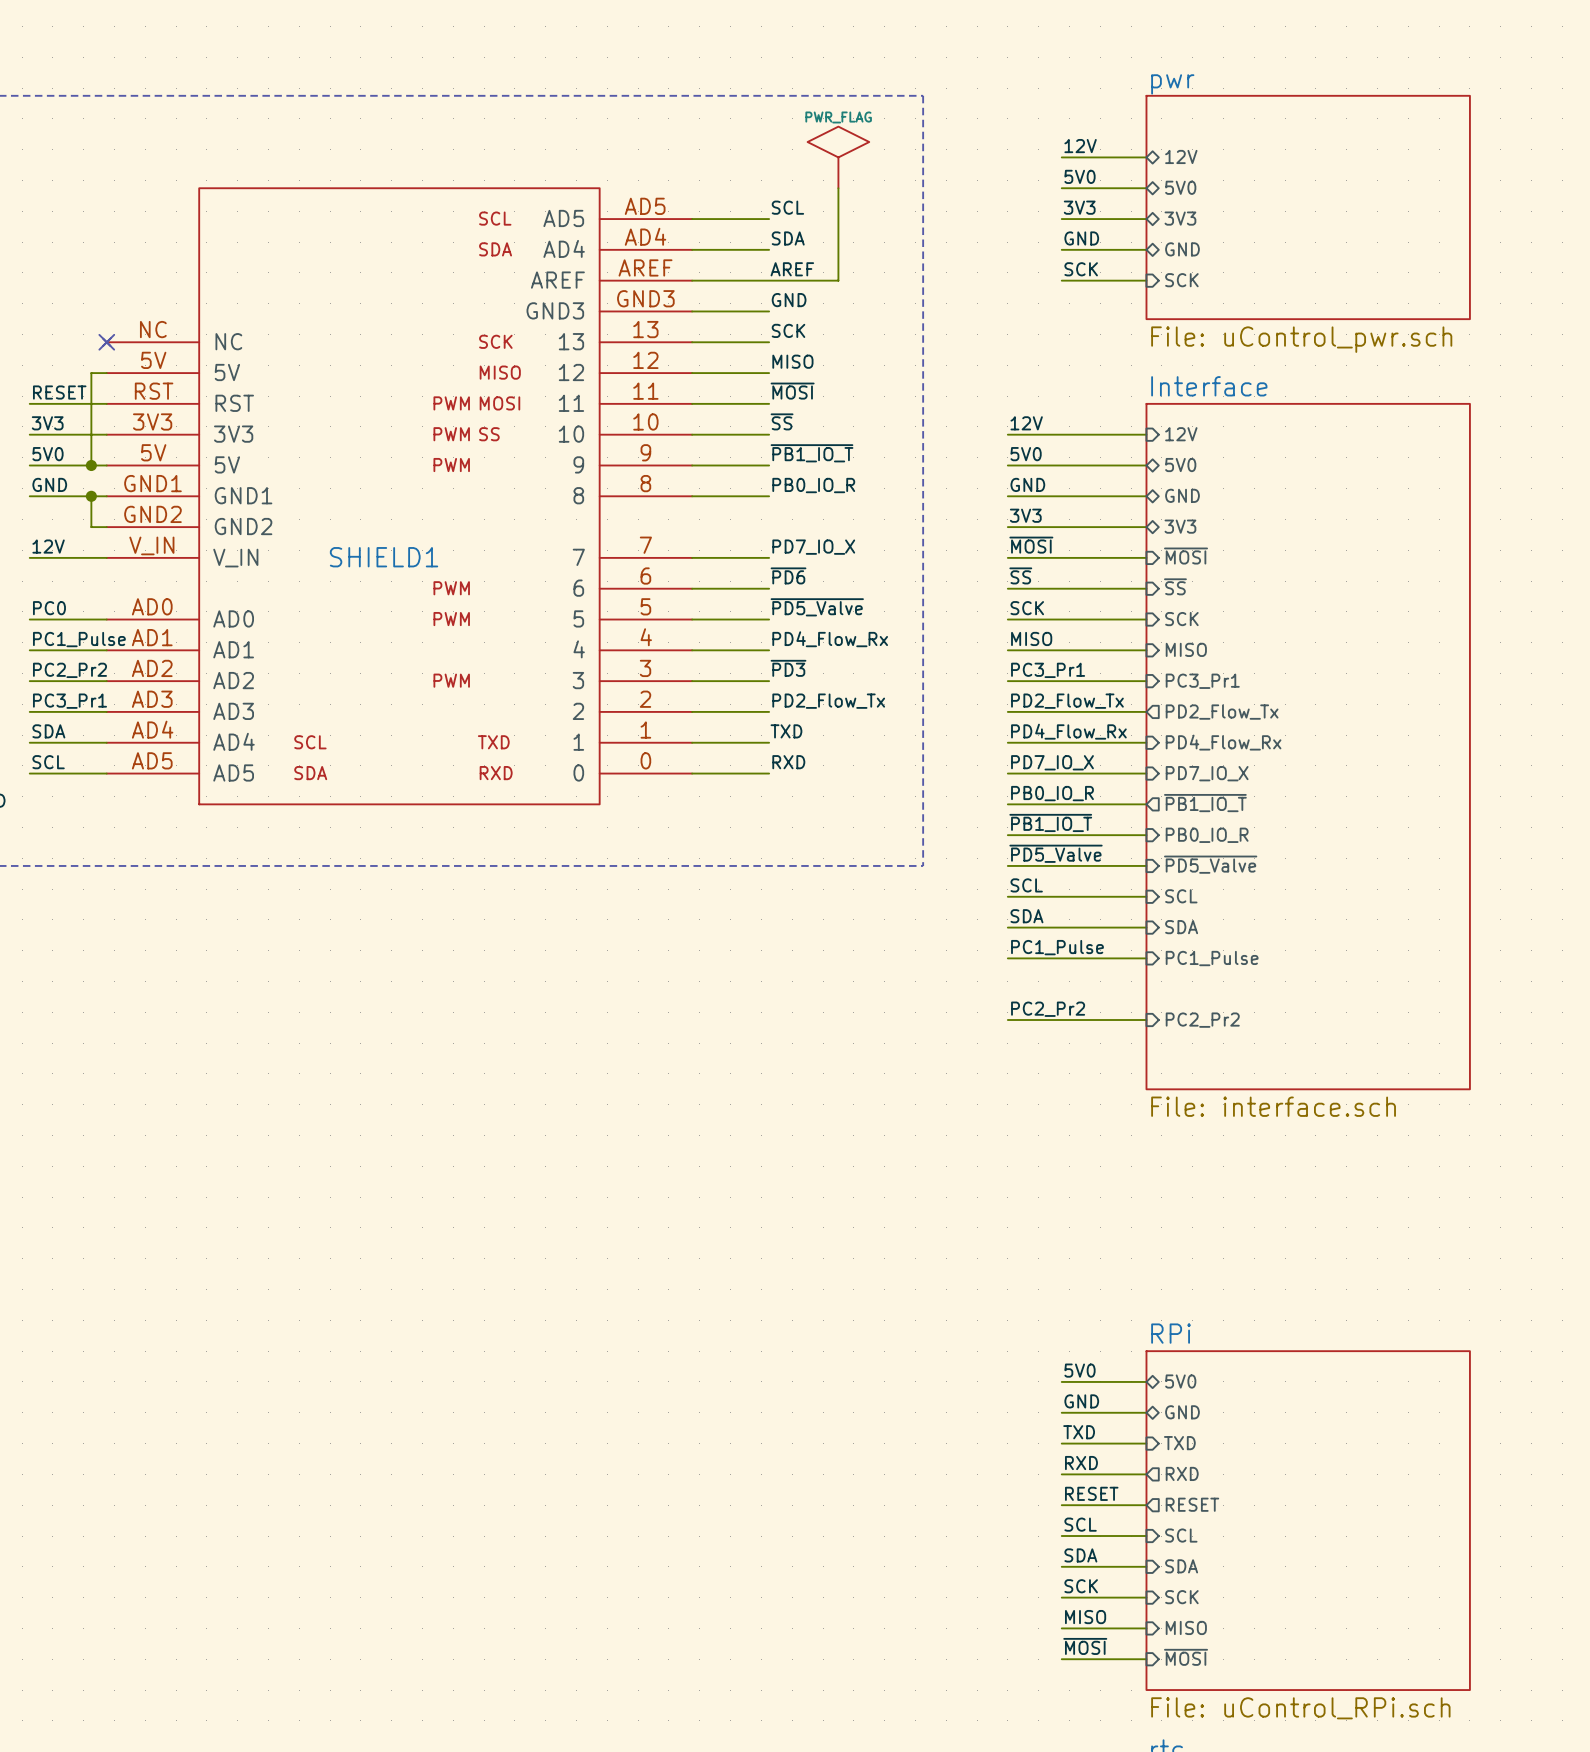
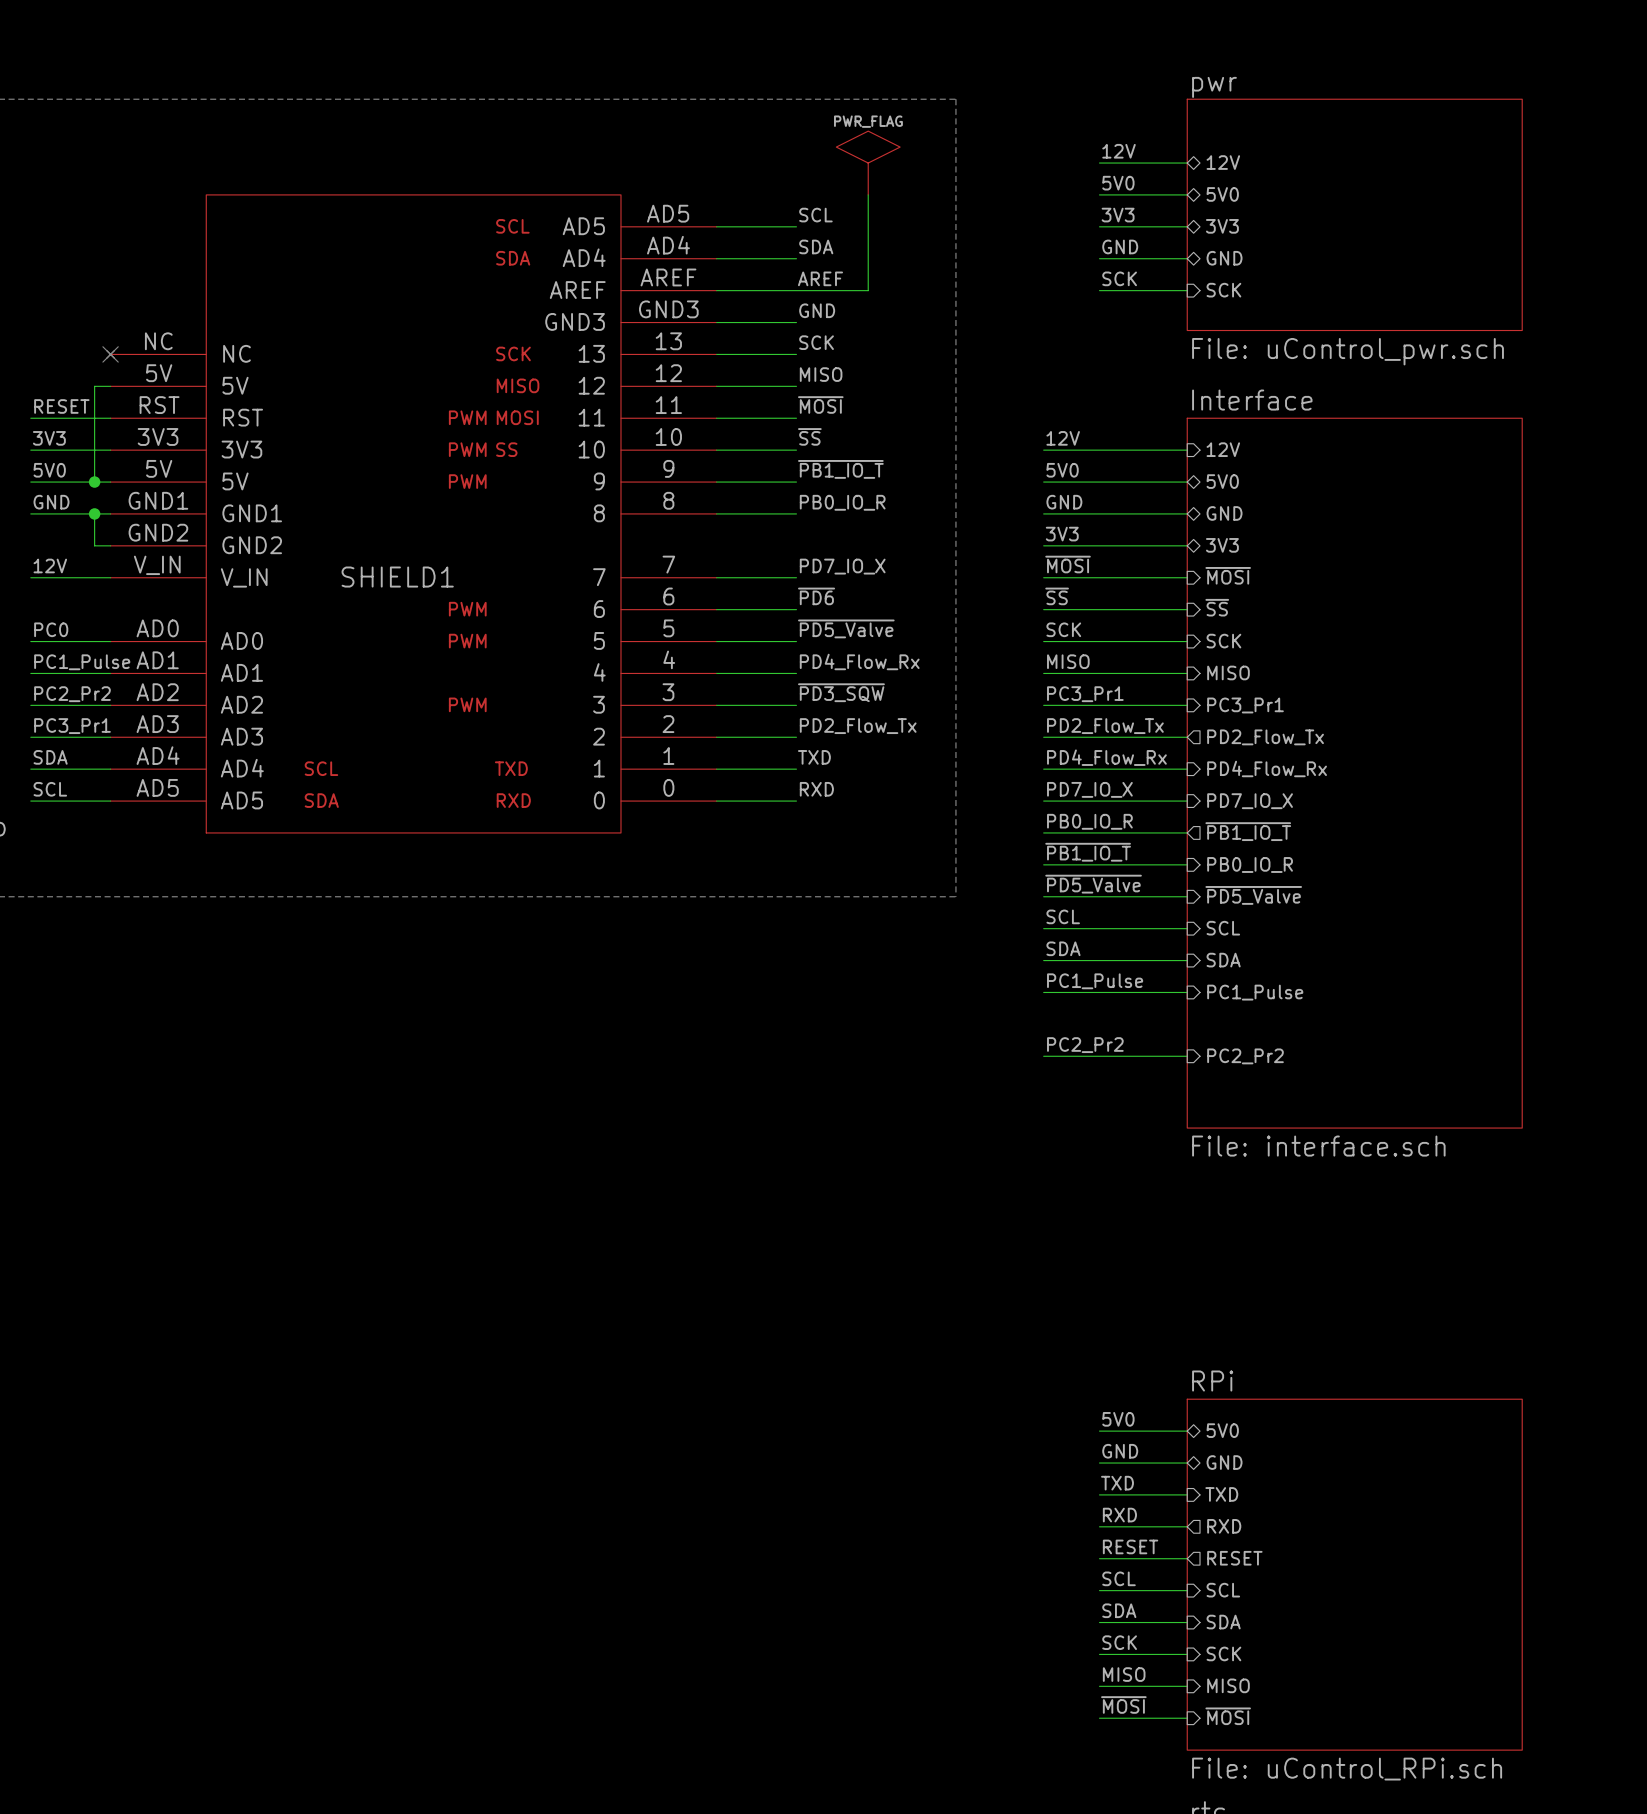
label: ~{PD3} (788, 668) -> ~{PD3_SQW} (841, 692)

